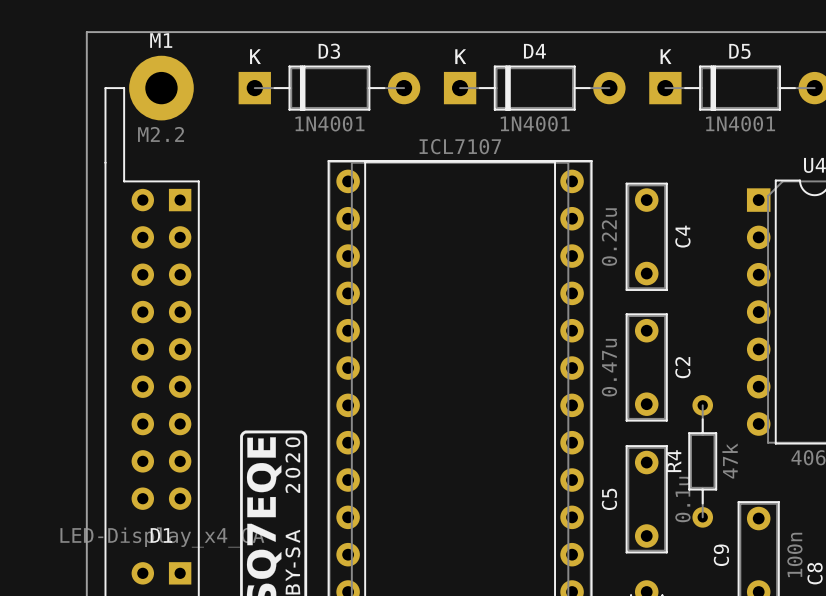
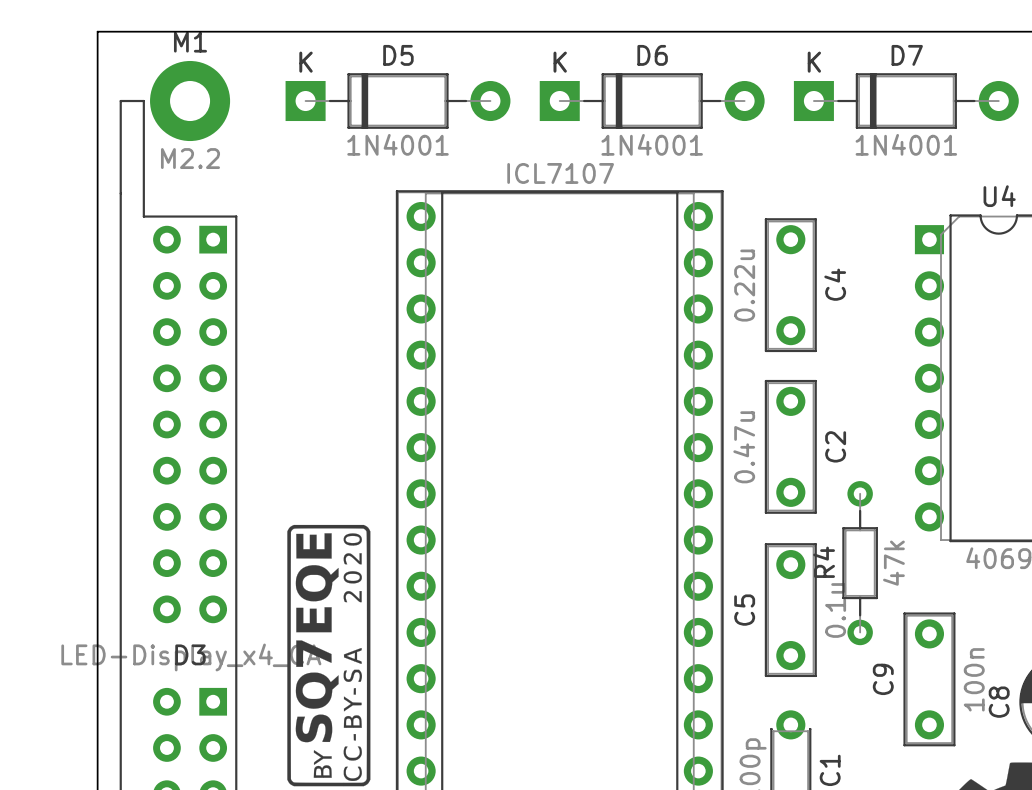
D3 name: D3 (329, 51) -> D5 (398, 55)
D4 name: D4 (534, 51) -> D6 (652, 55)
D5 name: D5 (739, 51) -> D7 (907, 55)
D1 name: D1 (161, 535) -> D3 (190, 654)

